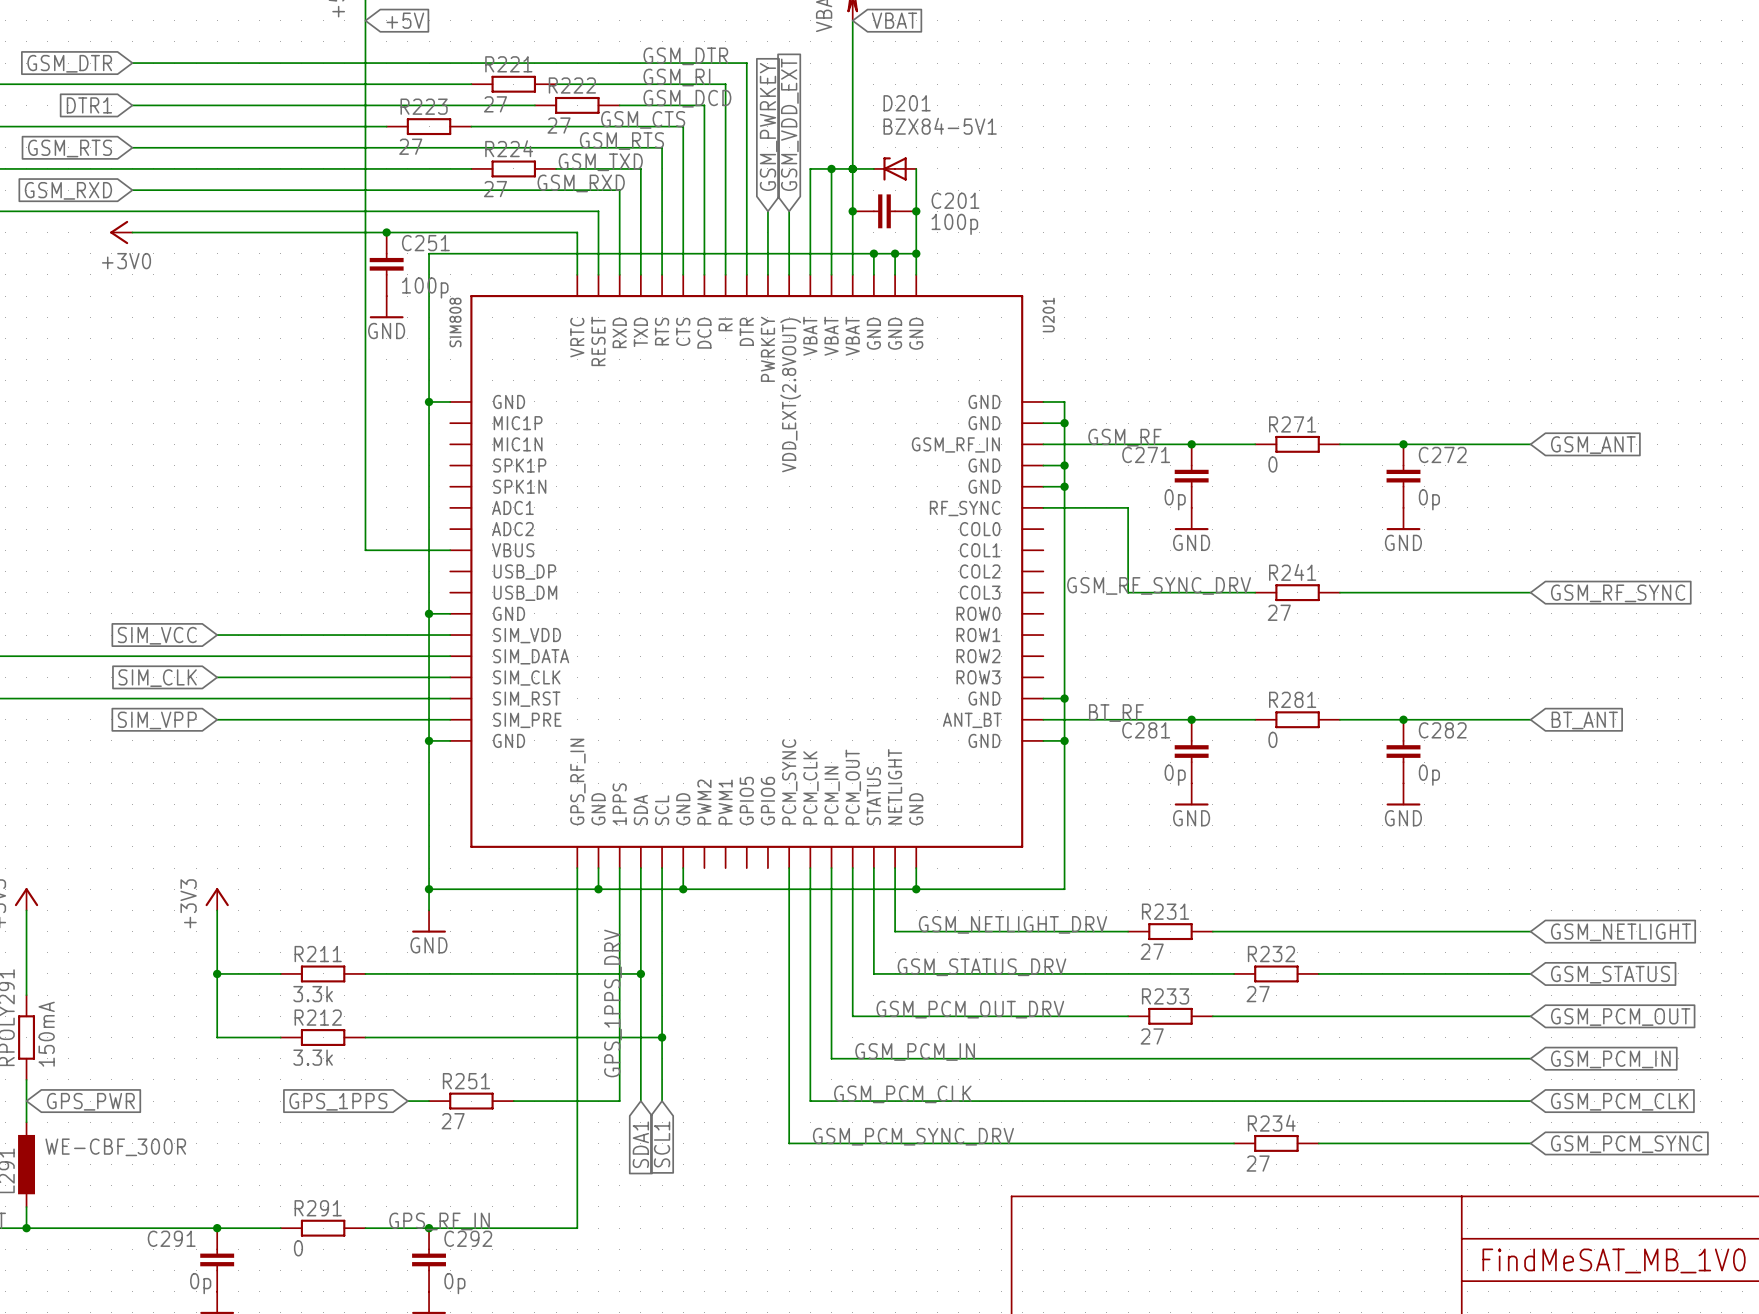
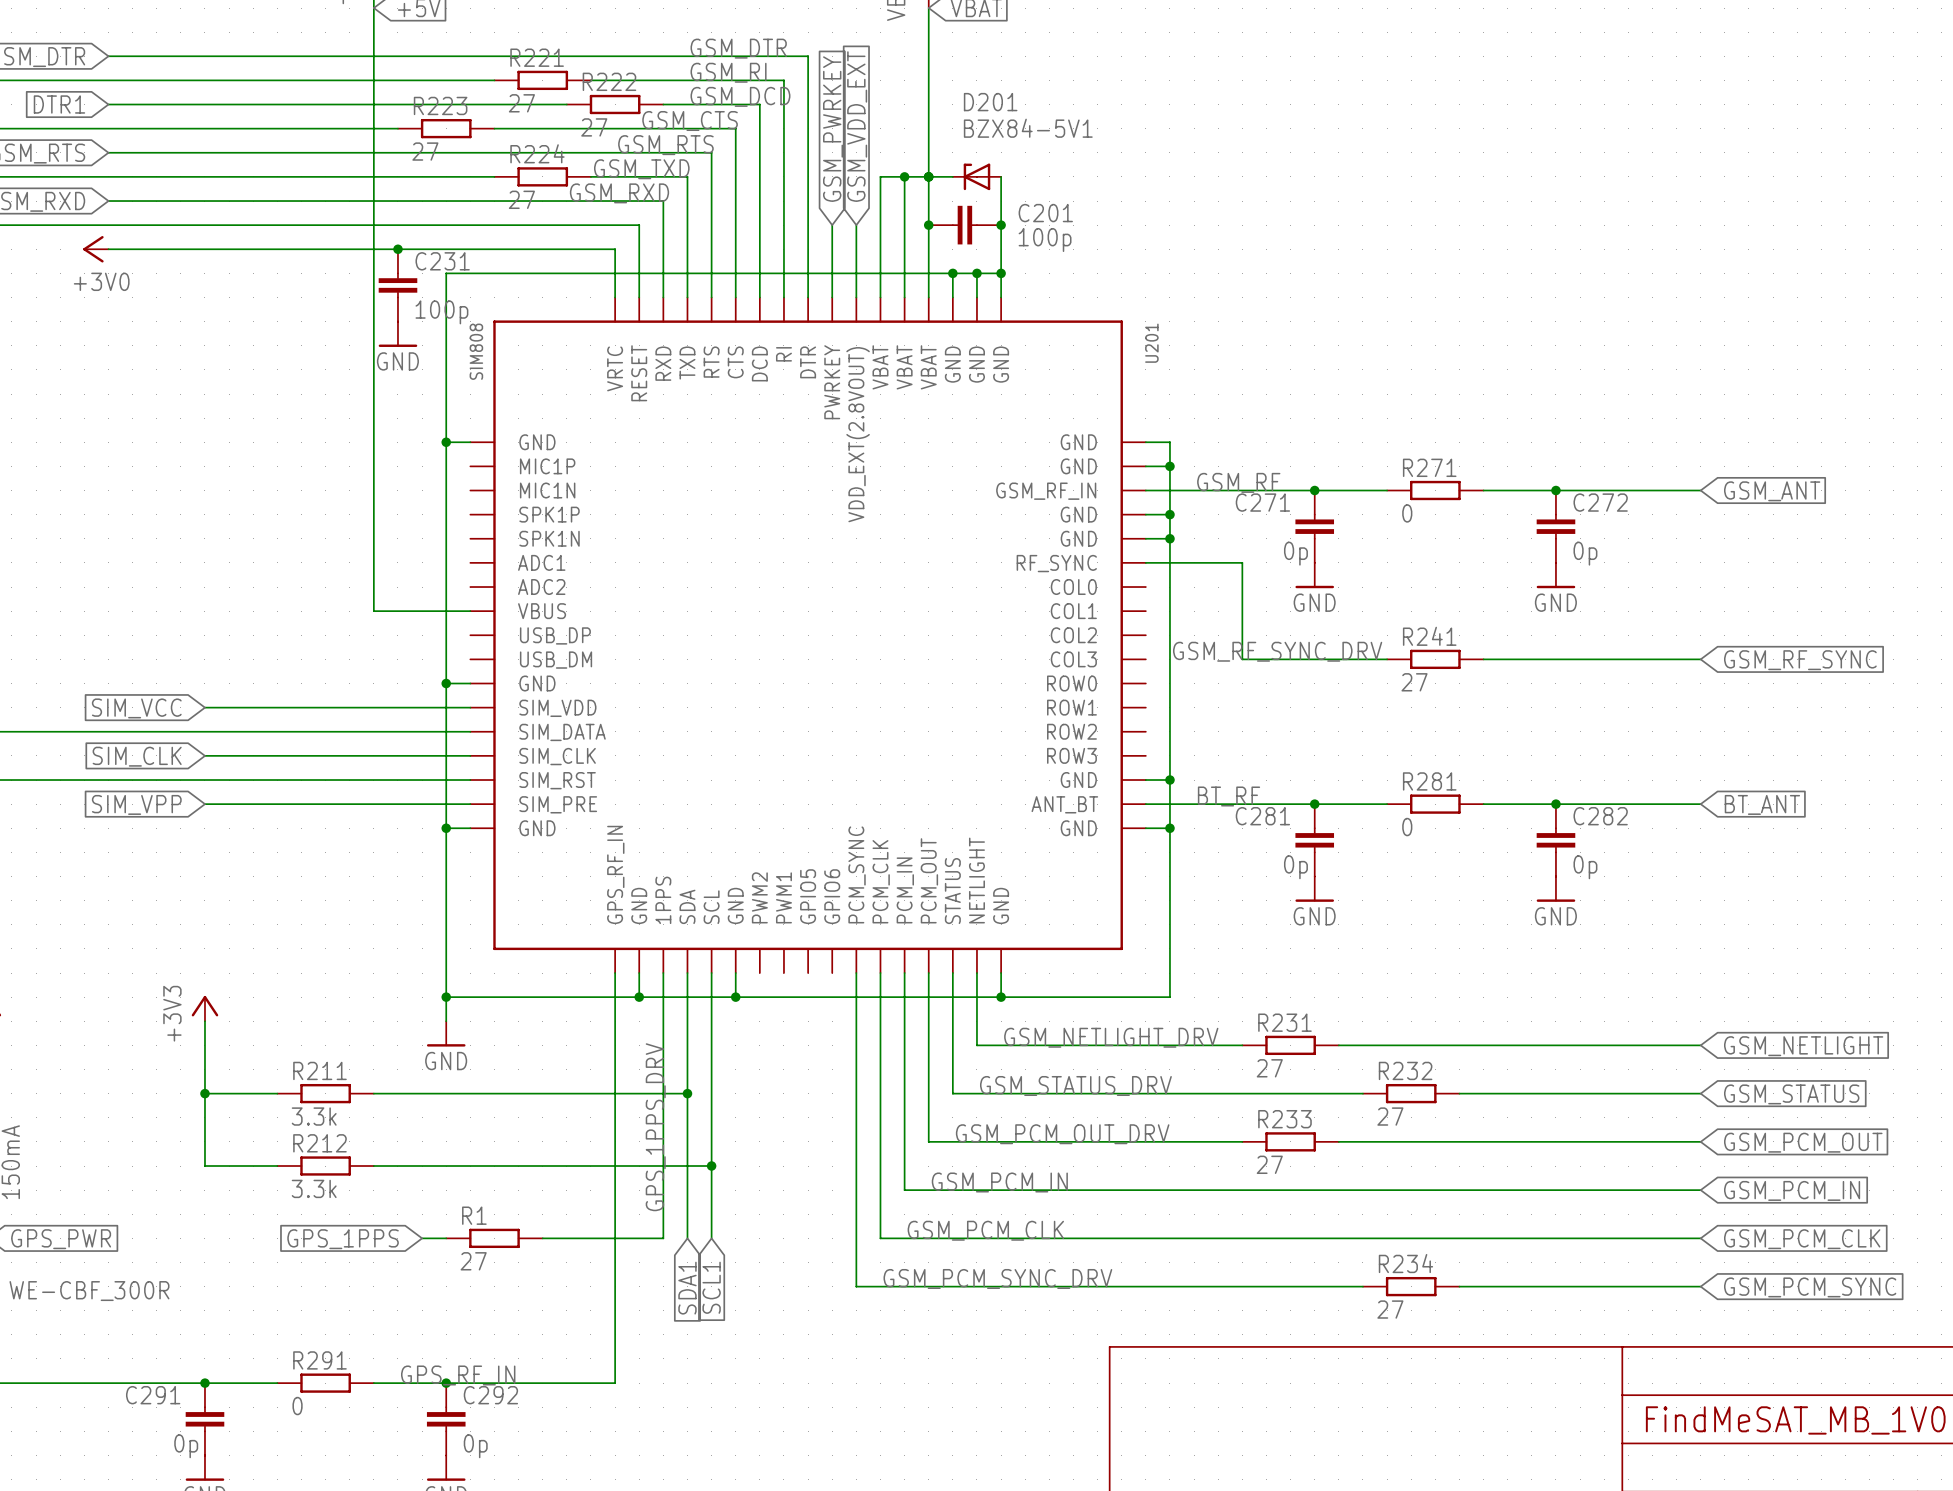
C251 name: C251 (425, 243) -> C231 (442, 261)
R251 name: R251 (466, 1081) -> R1 (474, 1215)

